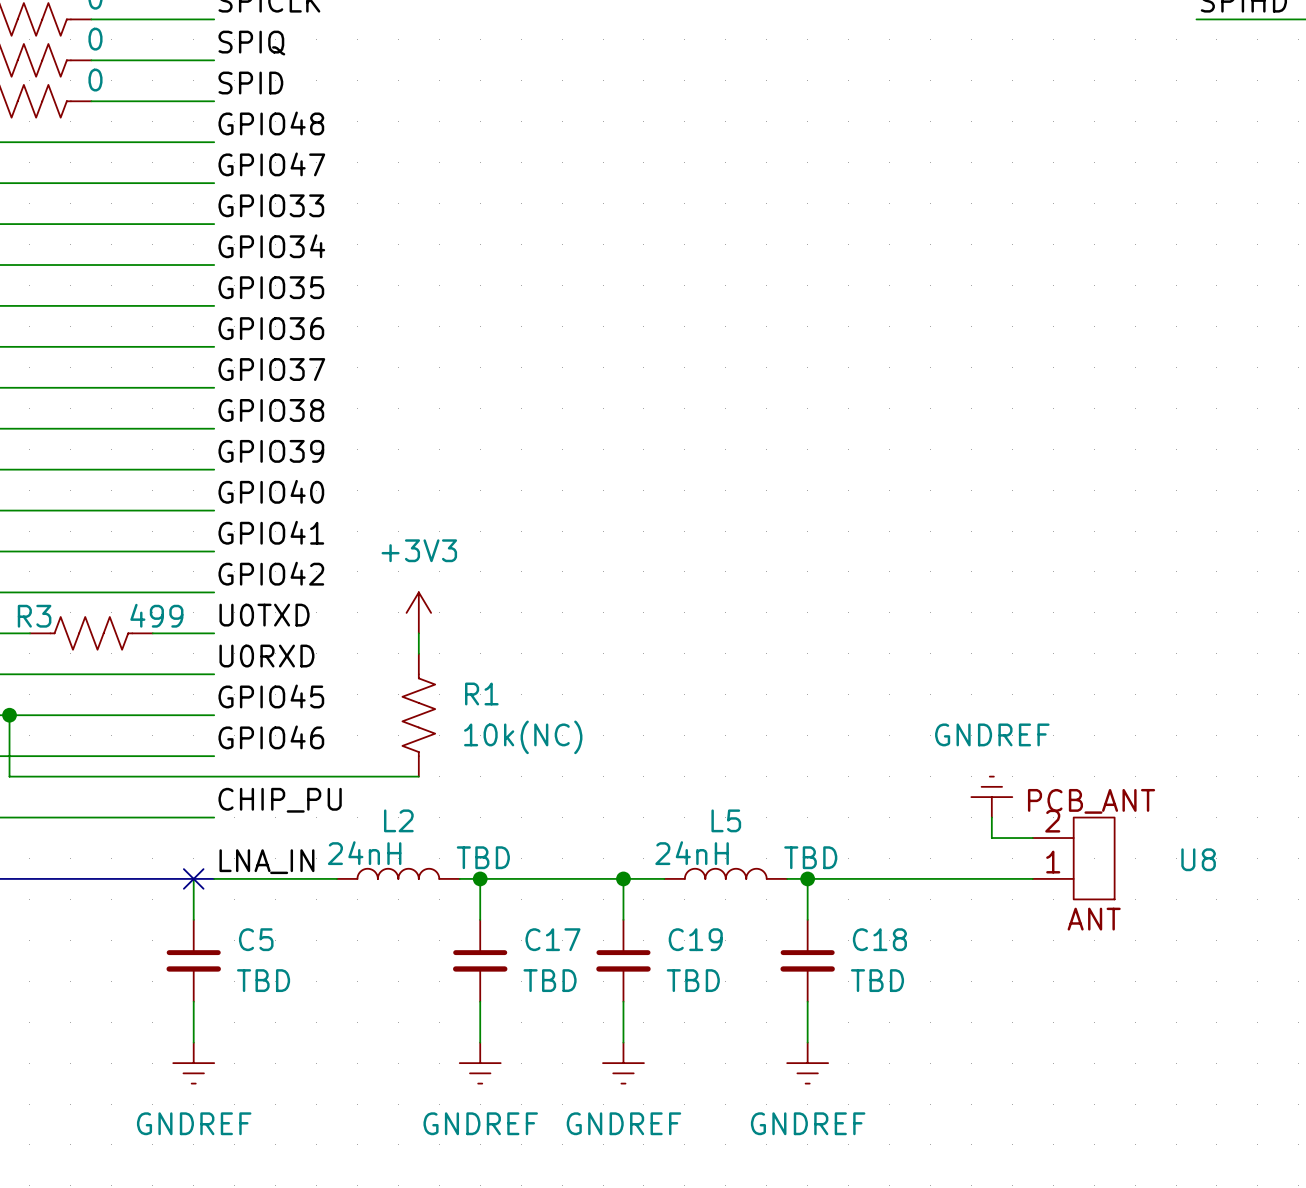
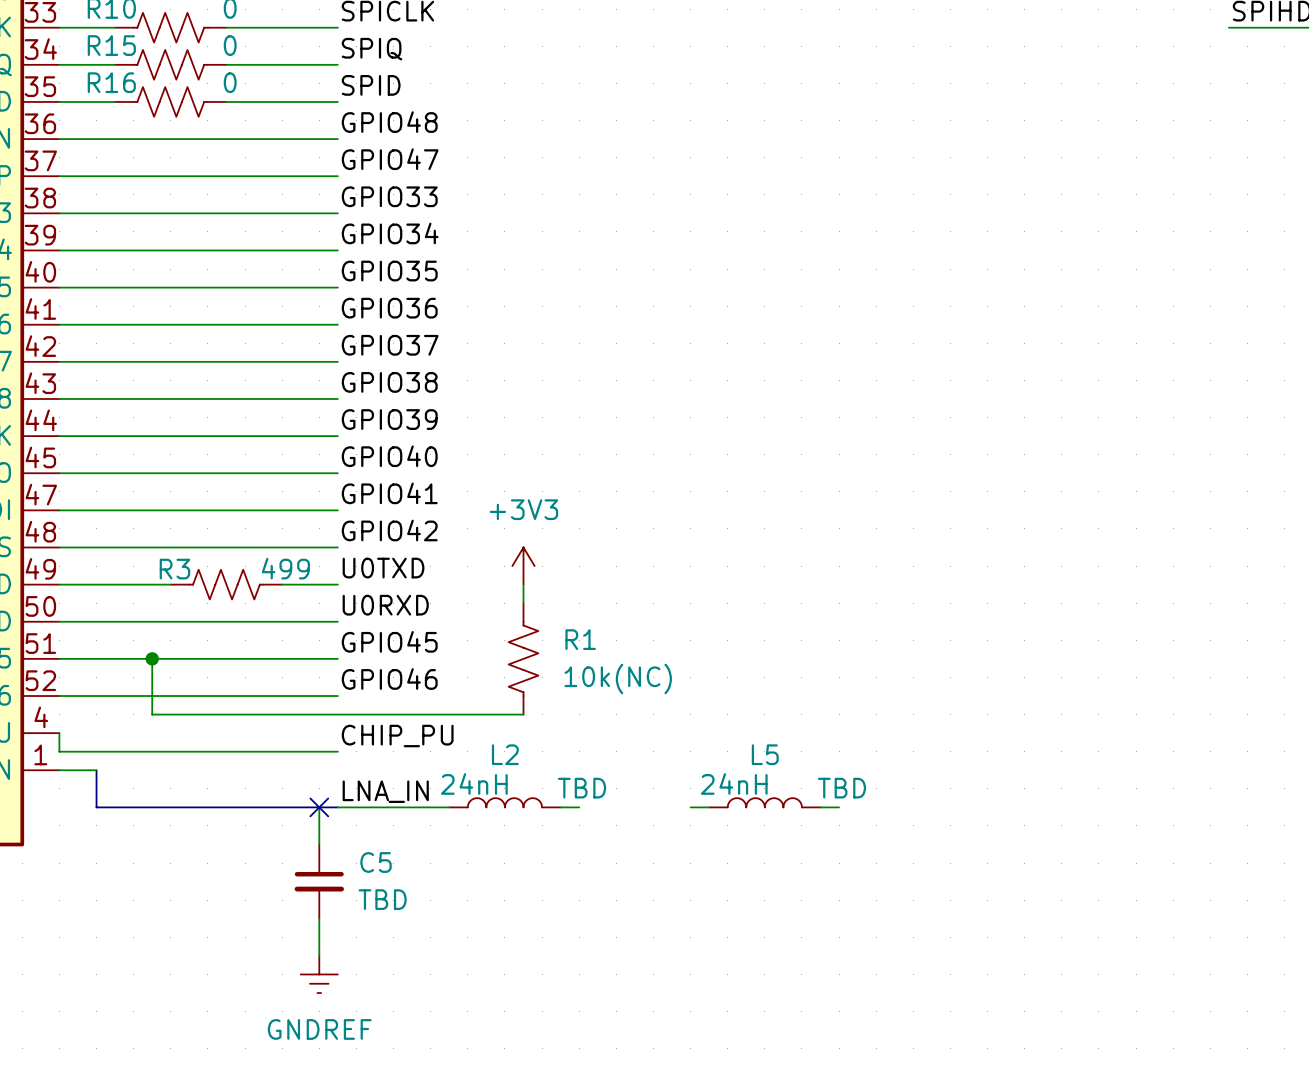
power symbol: GNDREF (991, 797) -> none
wire: (991, 817) (991, 838) (1032, 838) -> none
U8: (1073, 858) -> none
L5 position: (725, 873) -> (764, 802)
junction: (480, 878) -> none
wire: (603, 878) (480, 878) (480, 919) -> none
junction: (623, 878) -> none
wire: (664, 878) (623, 878) (623, 919) -> none
wire: none -> (820, 807) (839, 807)
wire: (787, 878) (1032, 878) -> none
wire: (807, 878) (807, 919) -> none
junction: (807, 878) -> none
C17: TBD (480, 960) -> none
C19: TBD (623, 960) -> none
C18: TBD (807, 960) -> none
wire: (480, 1001) (480, 1042) -> none
wire: (623, 1001) (623, 1042) -> none
wire: (807, 1001) (807, 1042) -> none
power symbol: GNDREF (480, 1063) -> none
power symbol: GNDREF (623, 1063) -> none
power symbol: GNDREF (807, 1063) -> none

